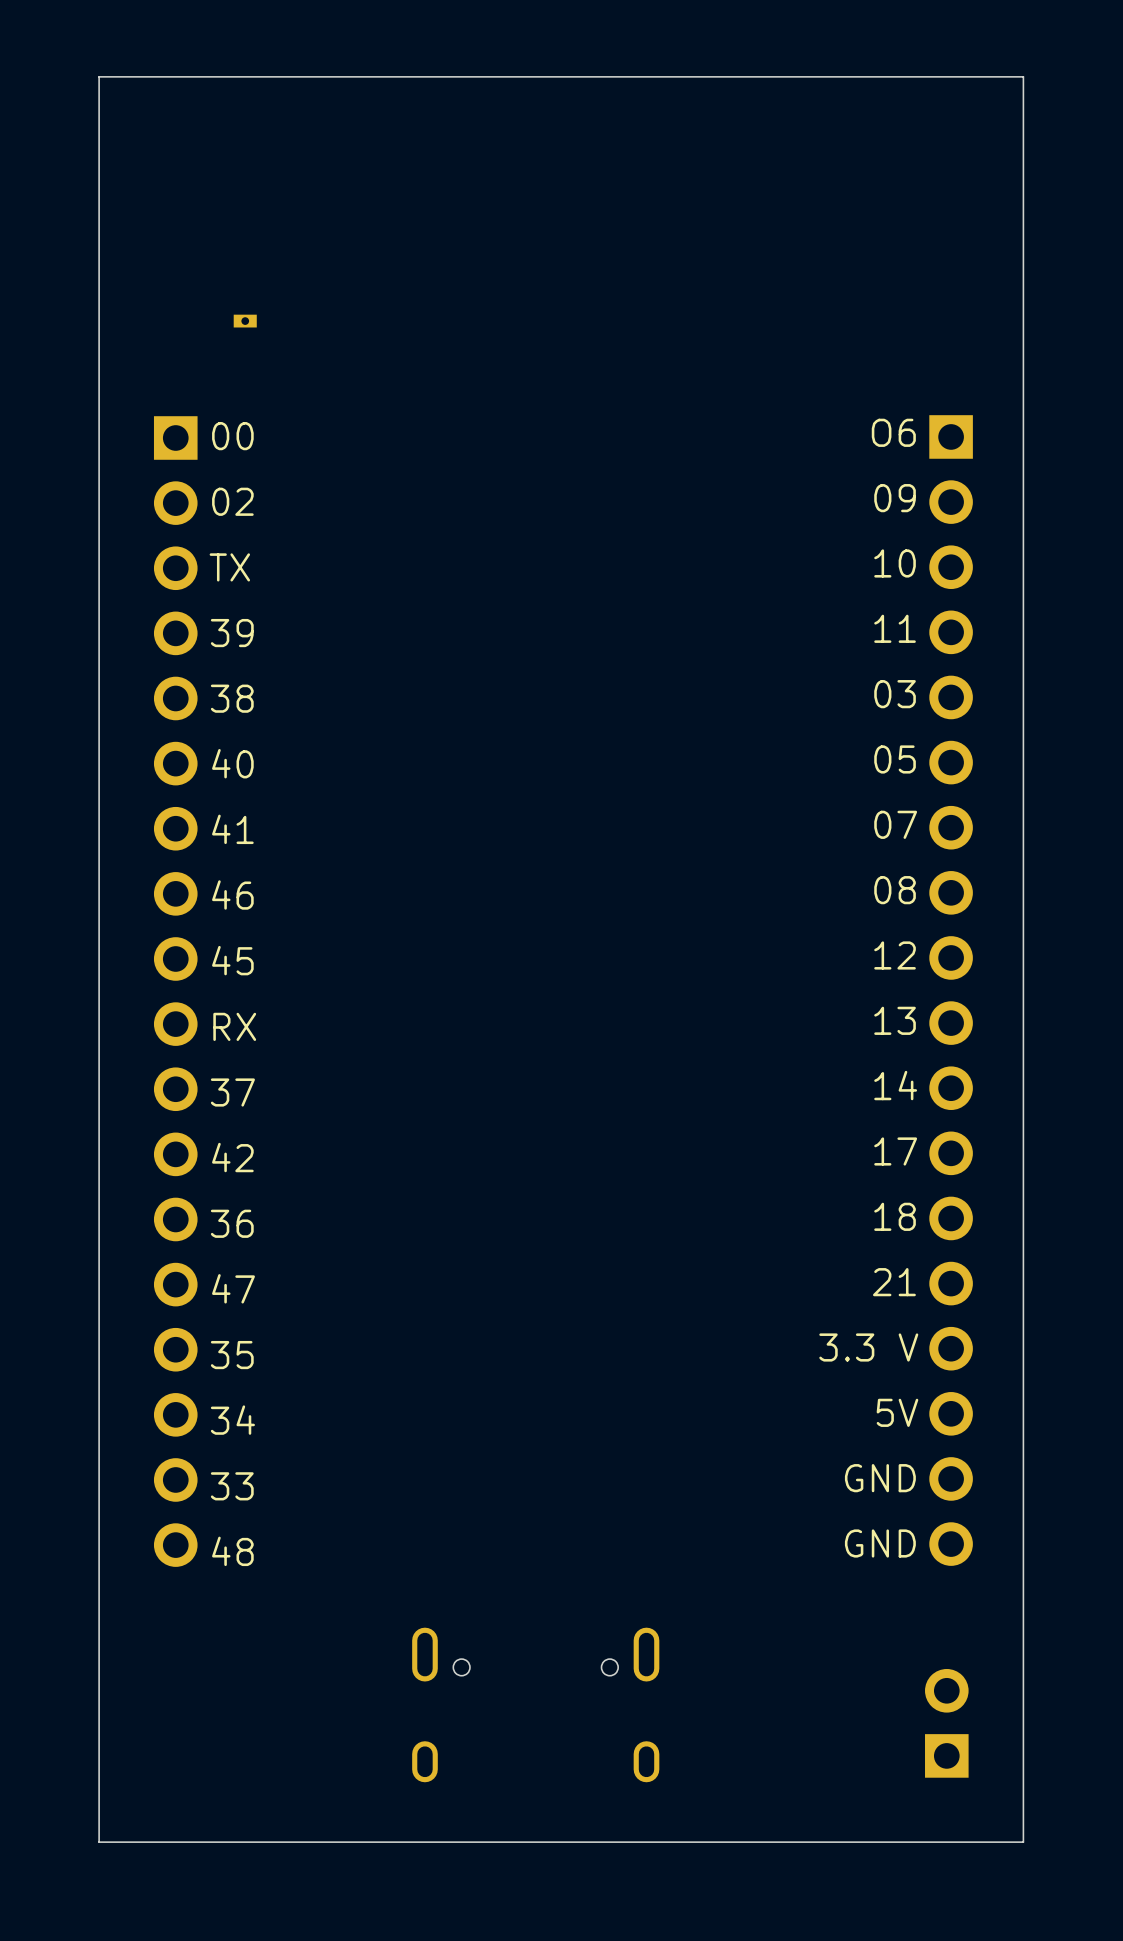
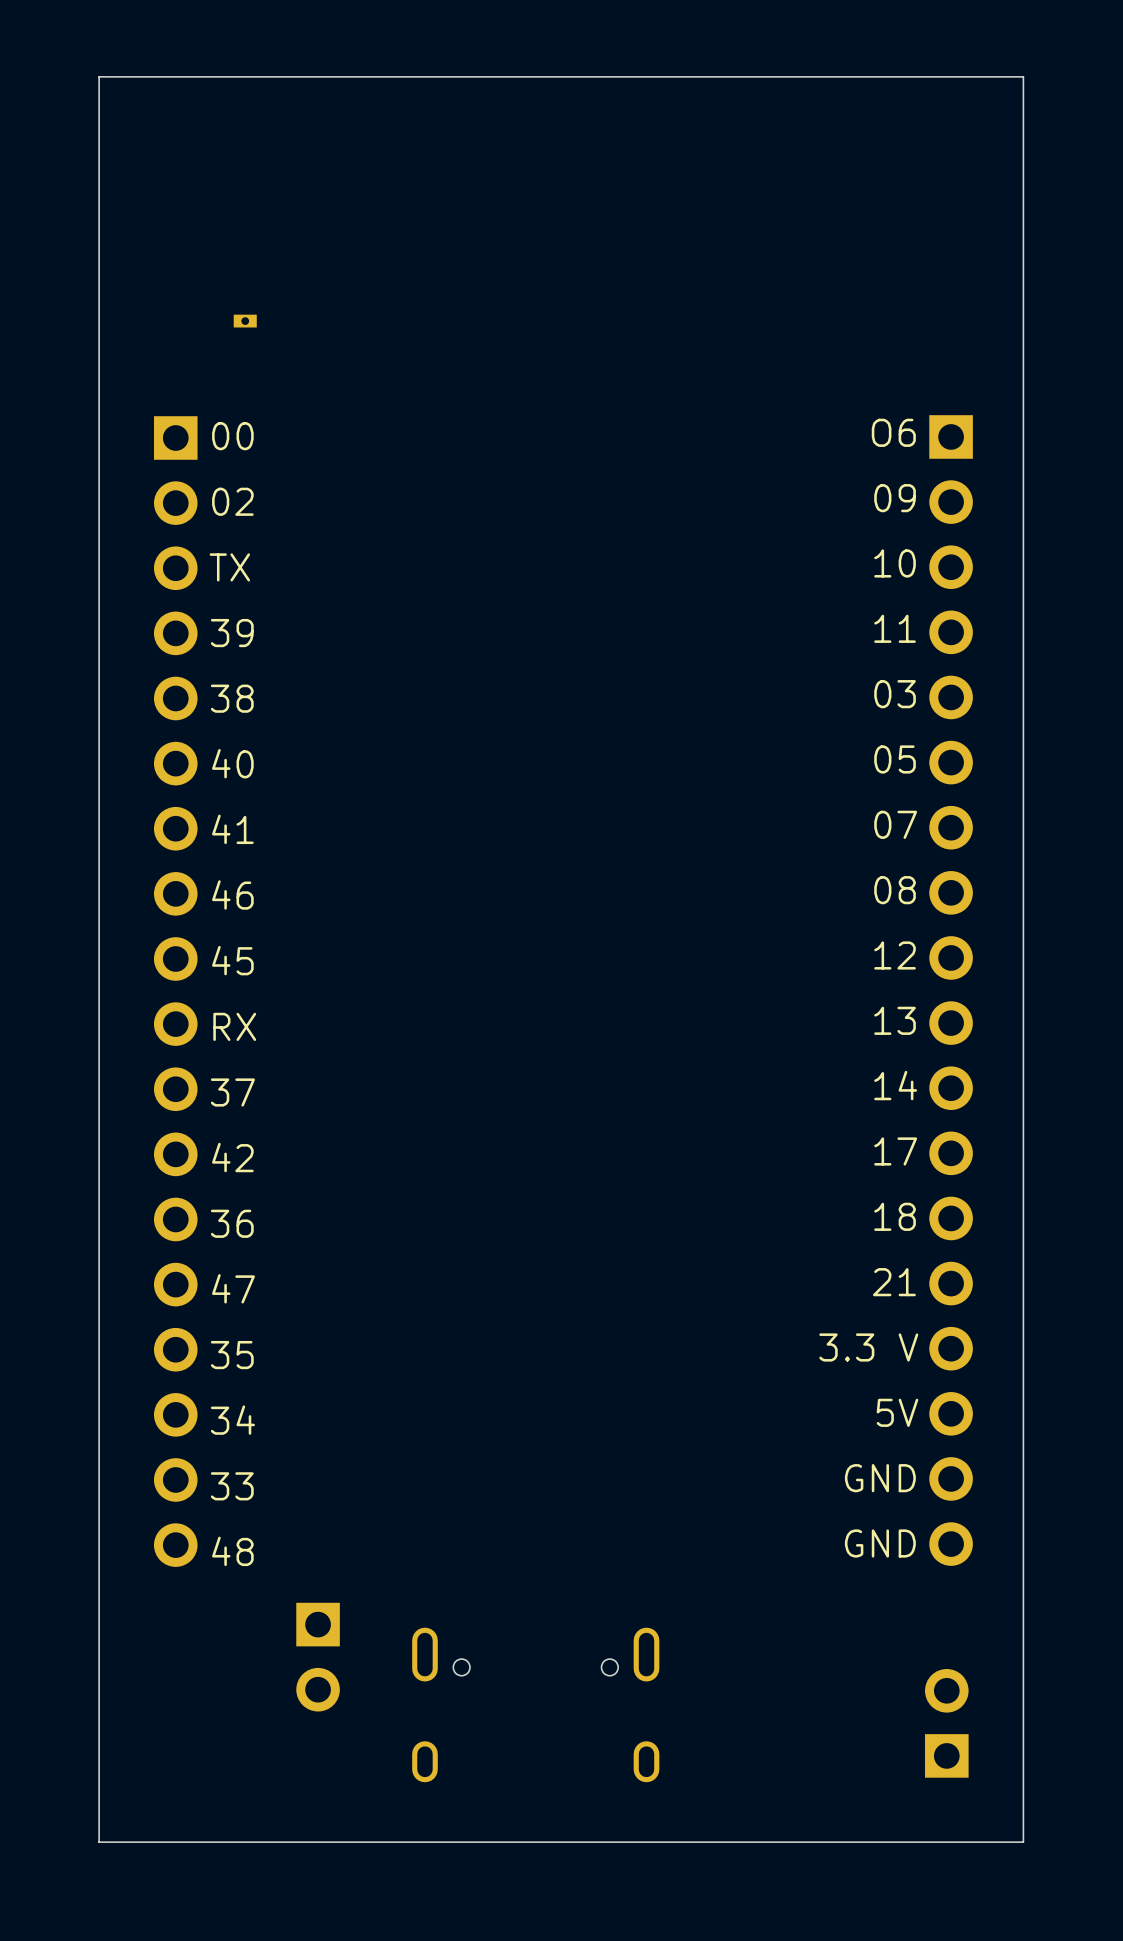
part: none -> (318, 1657)

